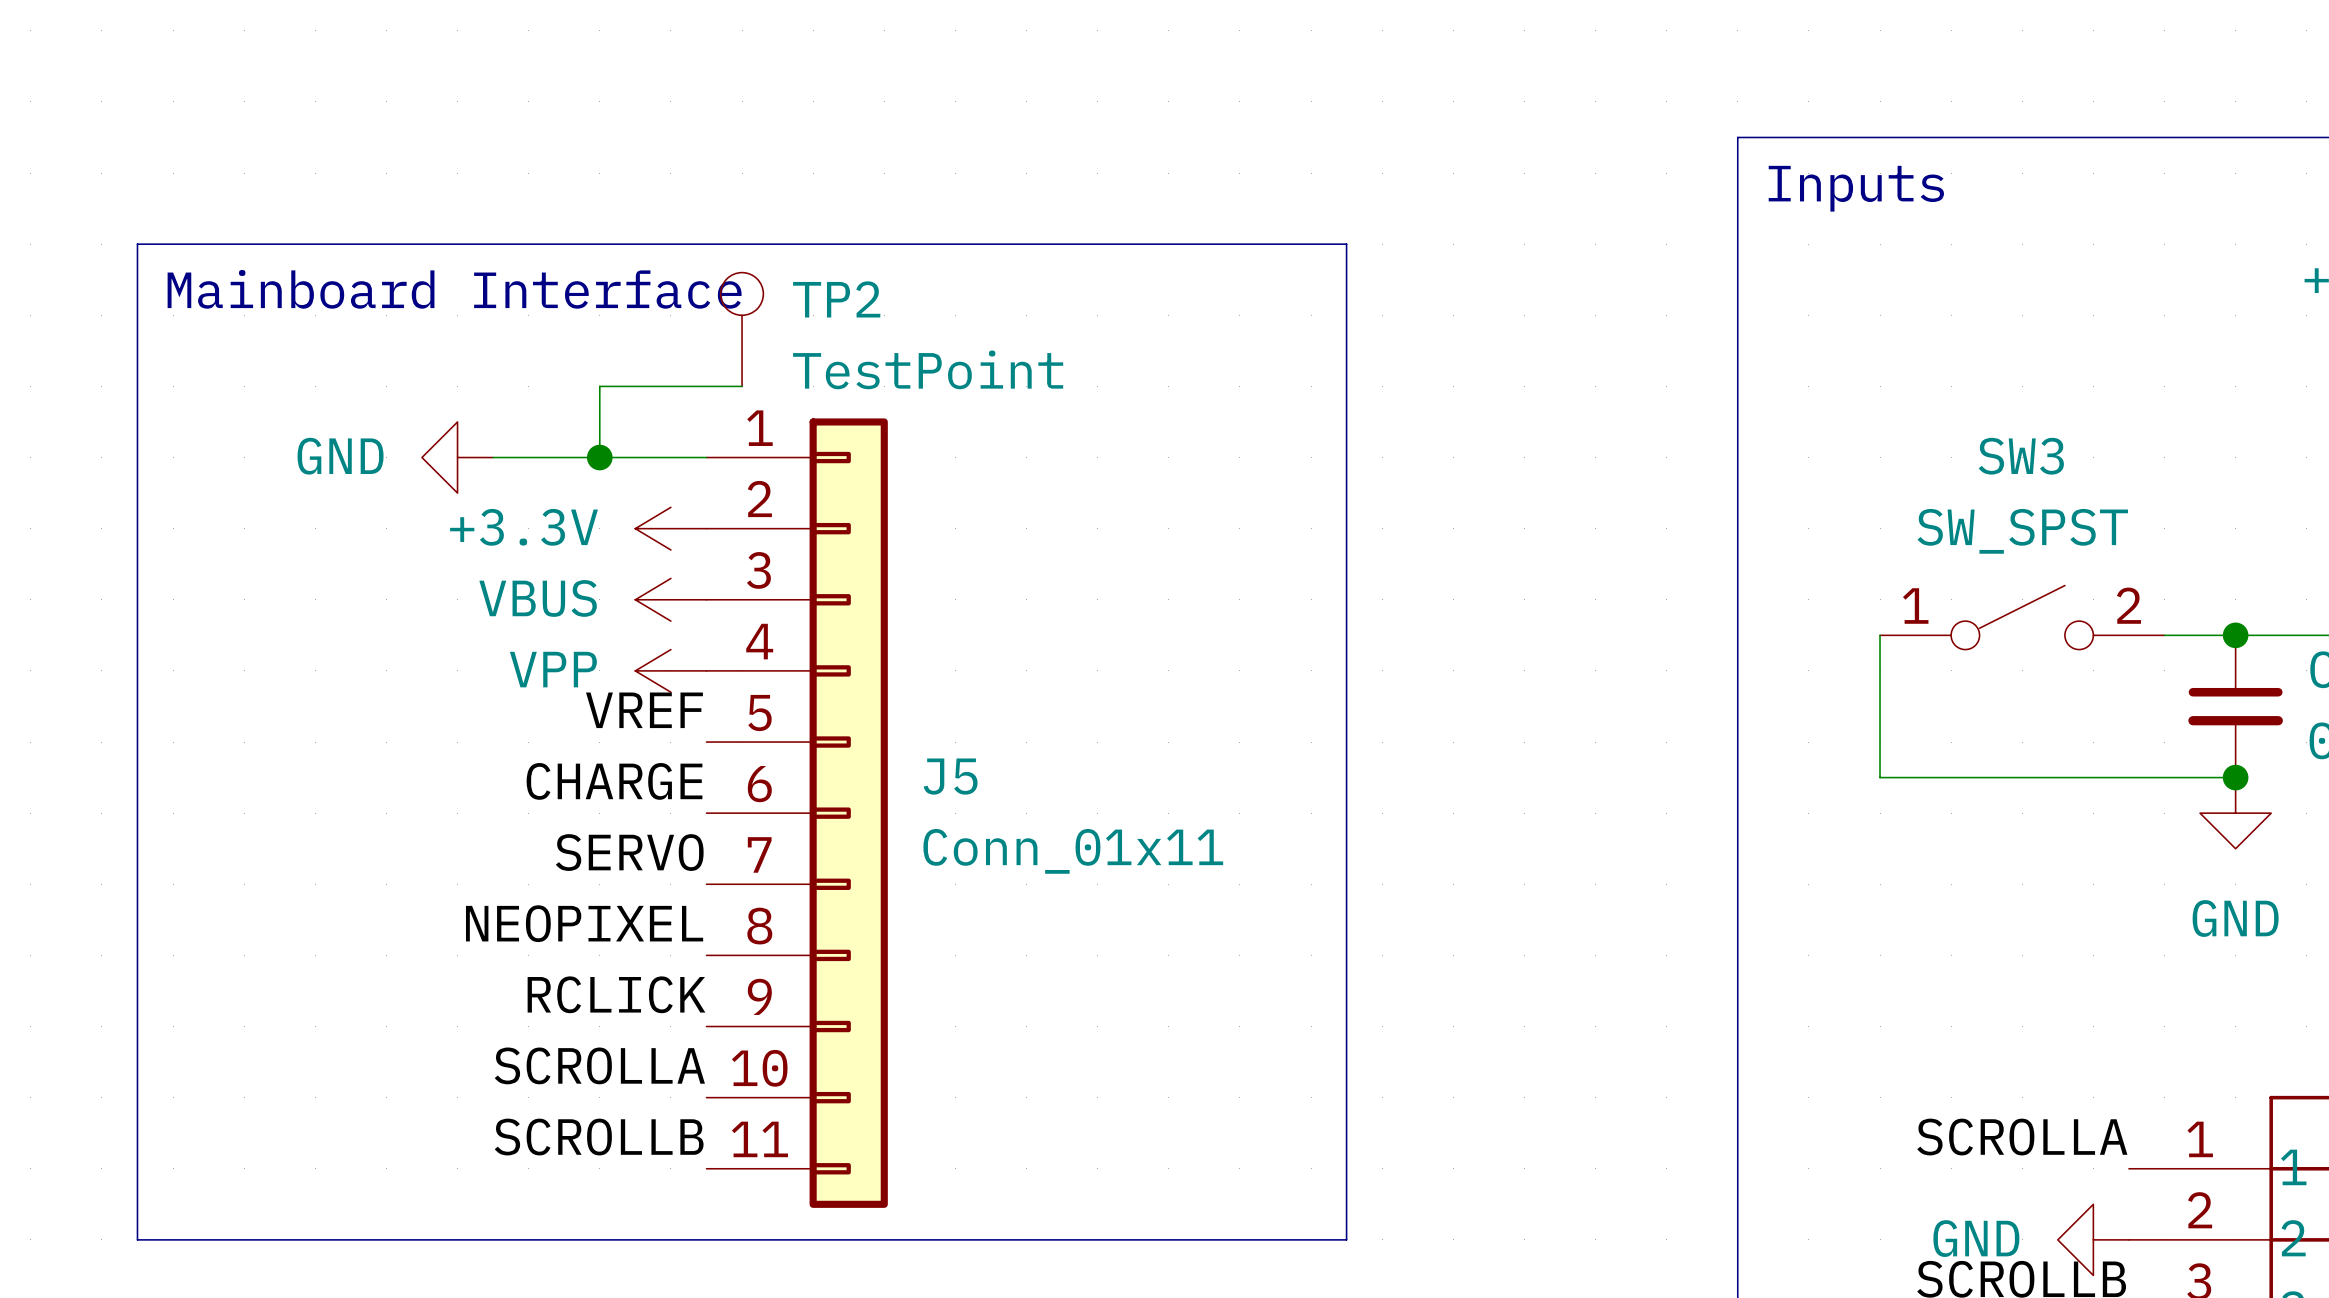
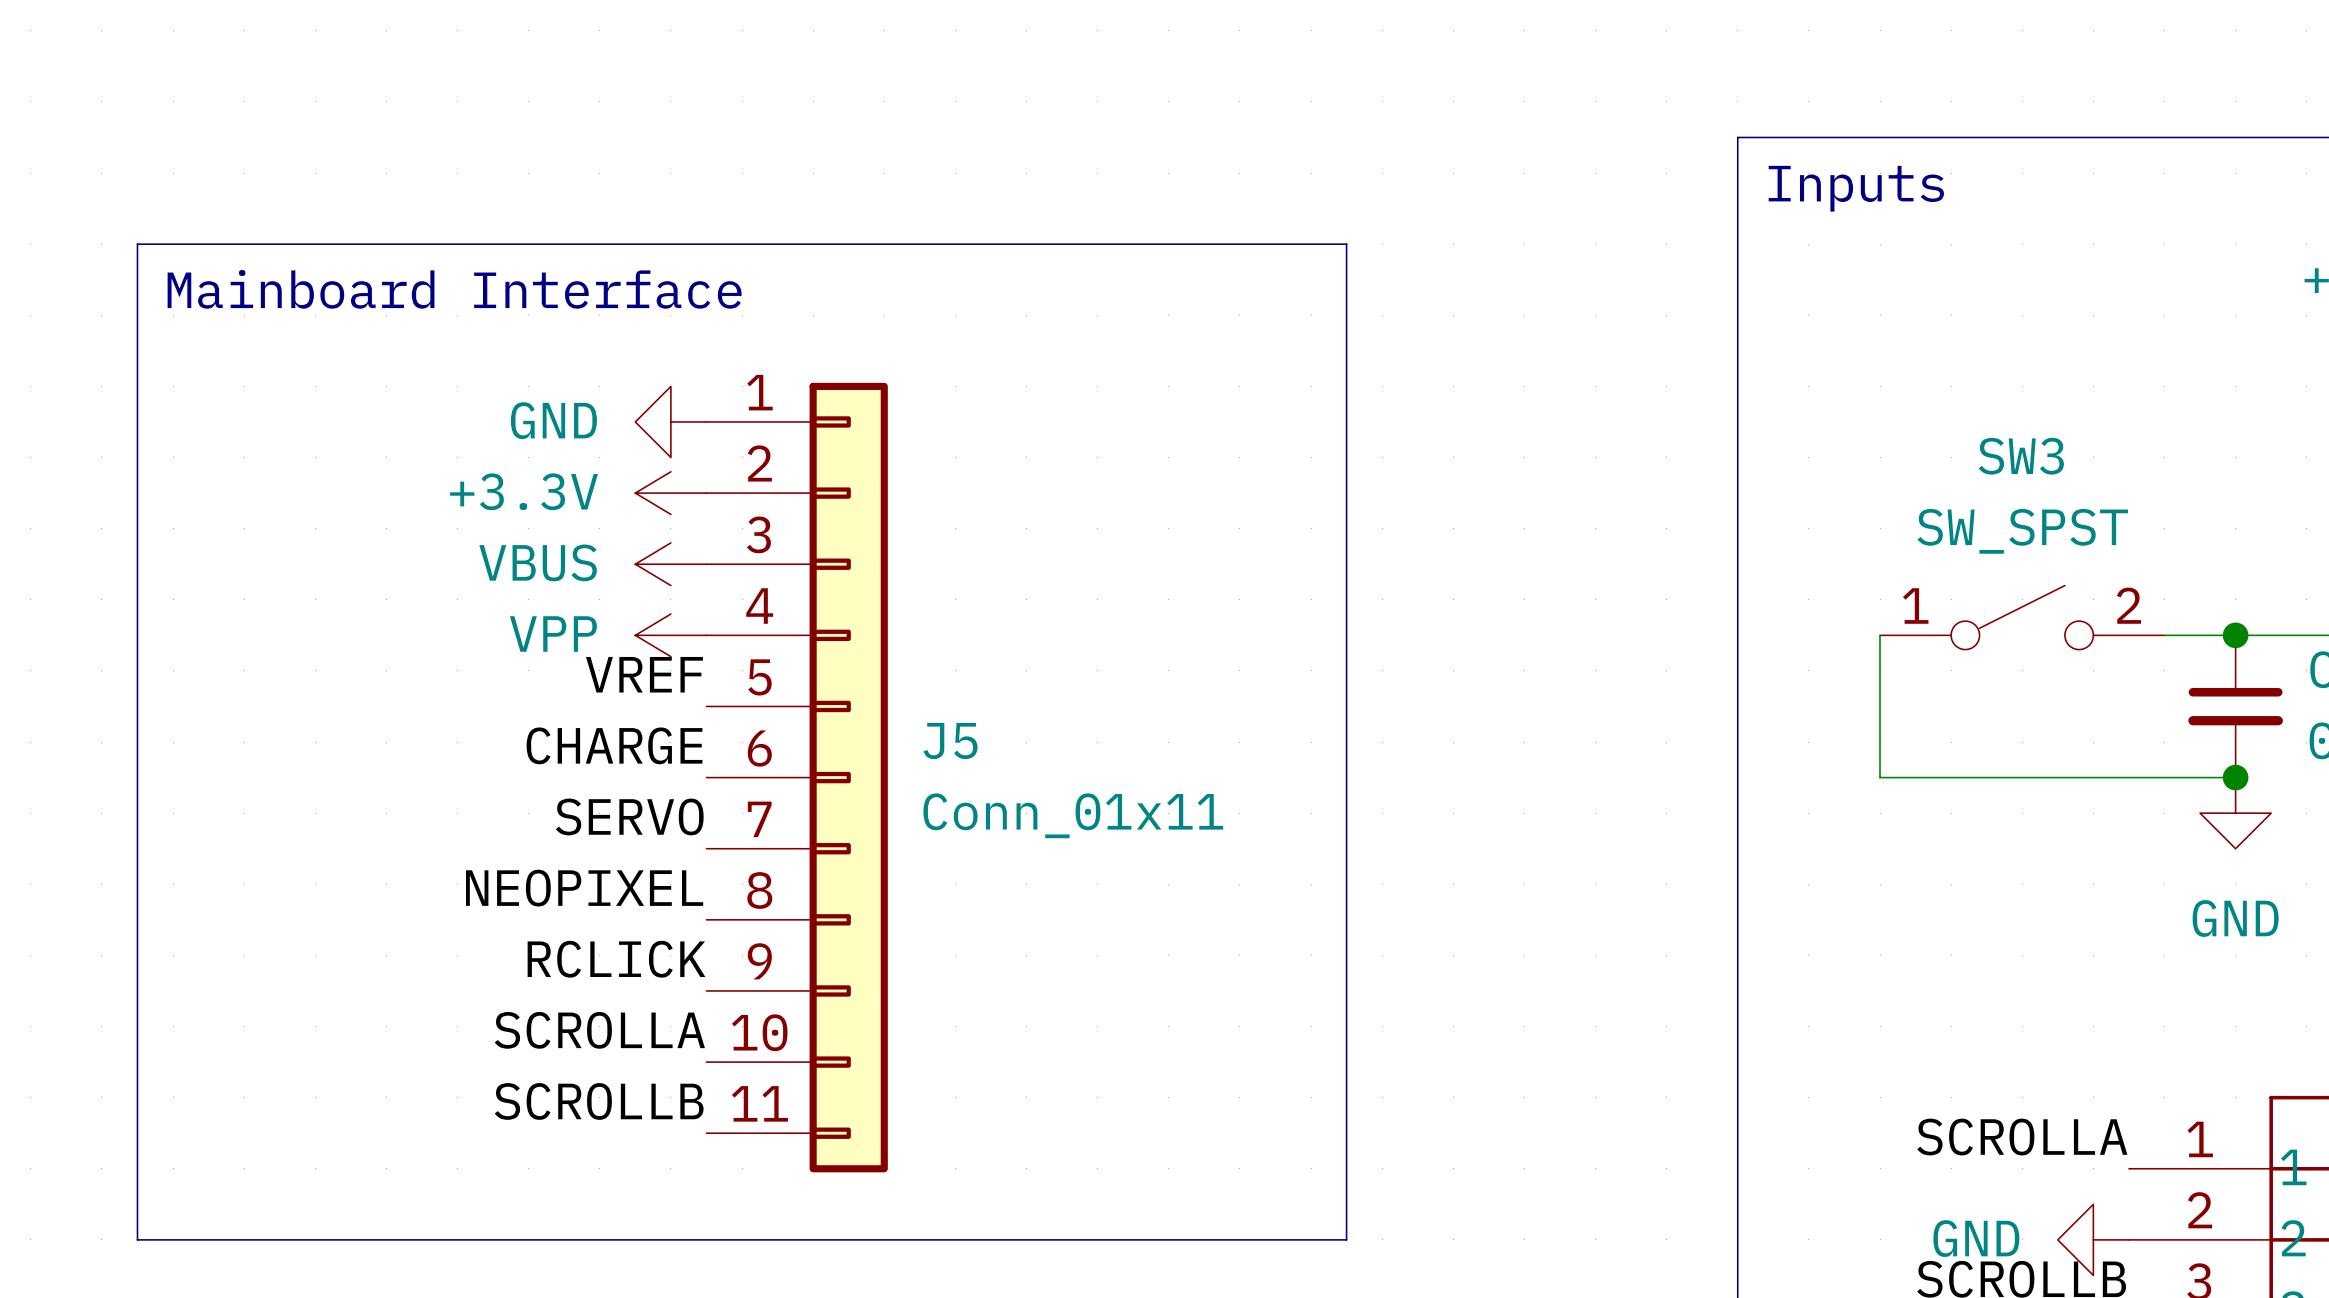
TP2: TestPoint (742, 329) -> none
wire: (742, 386) (599, 386) (599, 457) -> none
power symbol position: GND (457, 457) -> GND (670, 421)
wire: (493, 457) (706, 457) -> none
junction: (599, 457) -> none
power symbol position: +3.3V (670, 528) -> +3.3V (670, 493)
power symbol position: VBUS (670, 599) -> VBUS (670, 564)
power symbol position: VPP (670, 670) -> VPP (670, 635)
label position: VREF (644, 710) -> VREF (644, 674)
label position: CHARGE (614, 781) -> CHARGE (614, 745)
J5 position: (797, 813) -> (797, 777)
label position: SERVO (629, 852) -> SERVO (629, 816)
label position: NEOPIXEL (584, 923) -> NEOPIXEL (584, 888)
label position: RCLICK (616, 994) -> RCLICK (616, 959)
label position: SCROLLA (599, 1065) -> SCROLLA (599, 1030)
label position: SCROLLB (599, 1137) -> SCROLLB (599, 1101)

